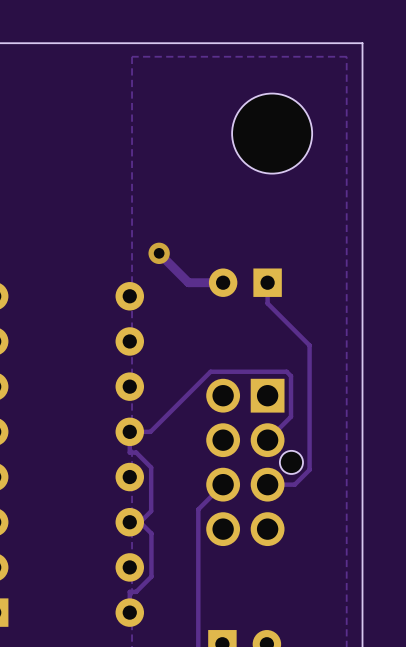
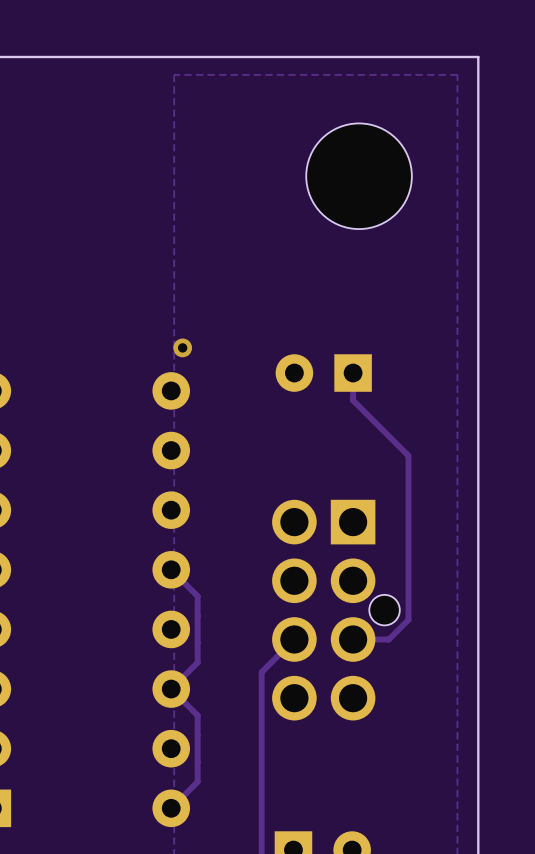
track: (159, 253) (188, 282) (223, 282) -> none
via: (159, 253) -> none
via: none -> (182, 347)
track: (267, 440) (291, 416) (291, 376) (286, 371) (210, 371) (150, 431) (129, 431) (129, 452) (136, 452) (151, 467) (151, 511) (140, 522) -> none
track: (140, 522) (151, 533) (151, 576) (136, 591) (129, 591) (129, 612) -> (171, 569) (197, 596) (197, 662) (171, 689) (197, 715) (197, 781) (171, 808)

